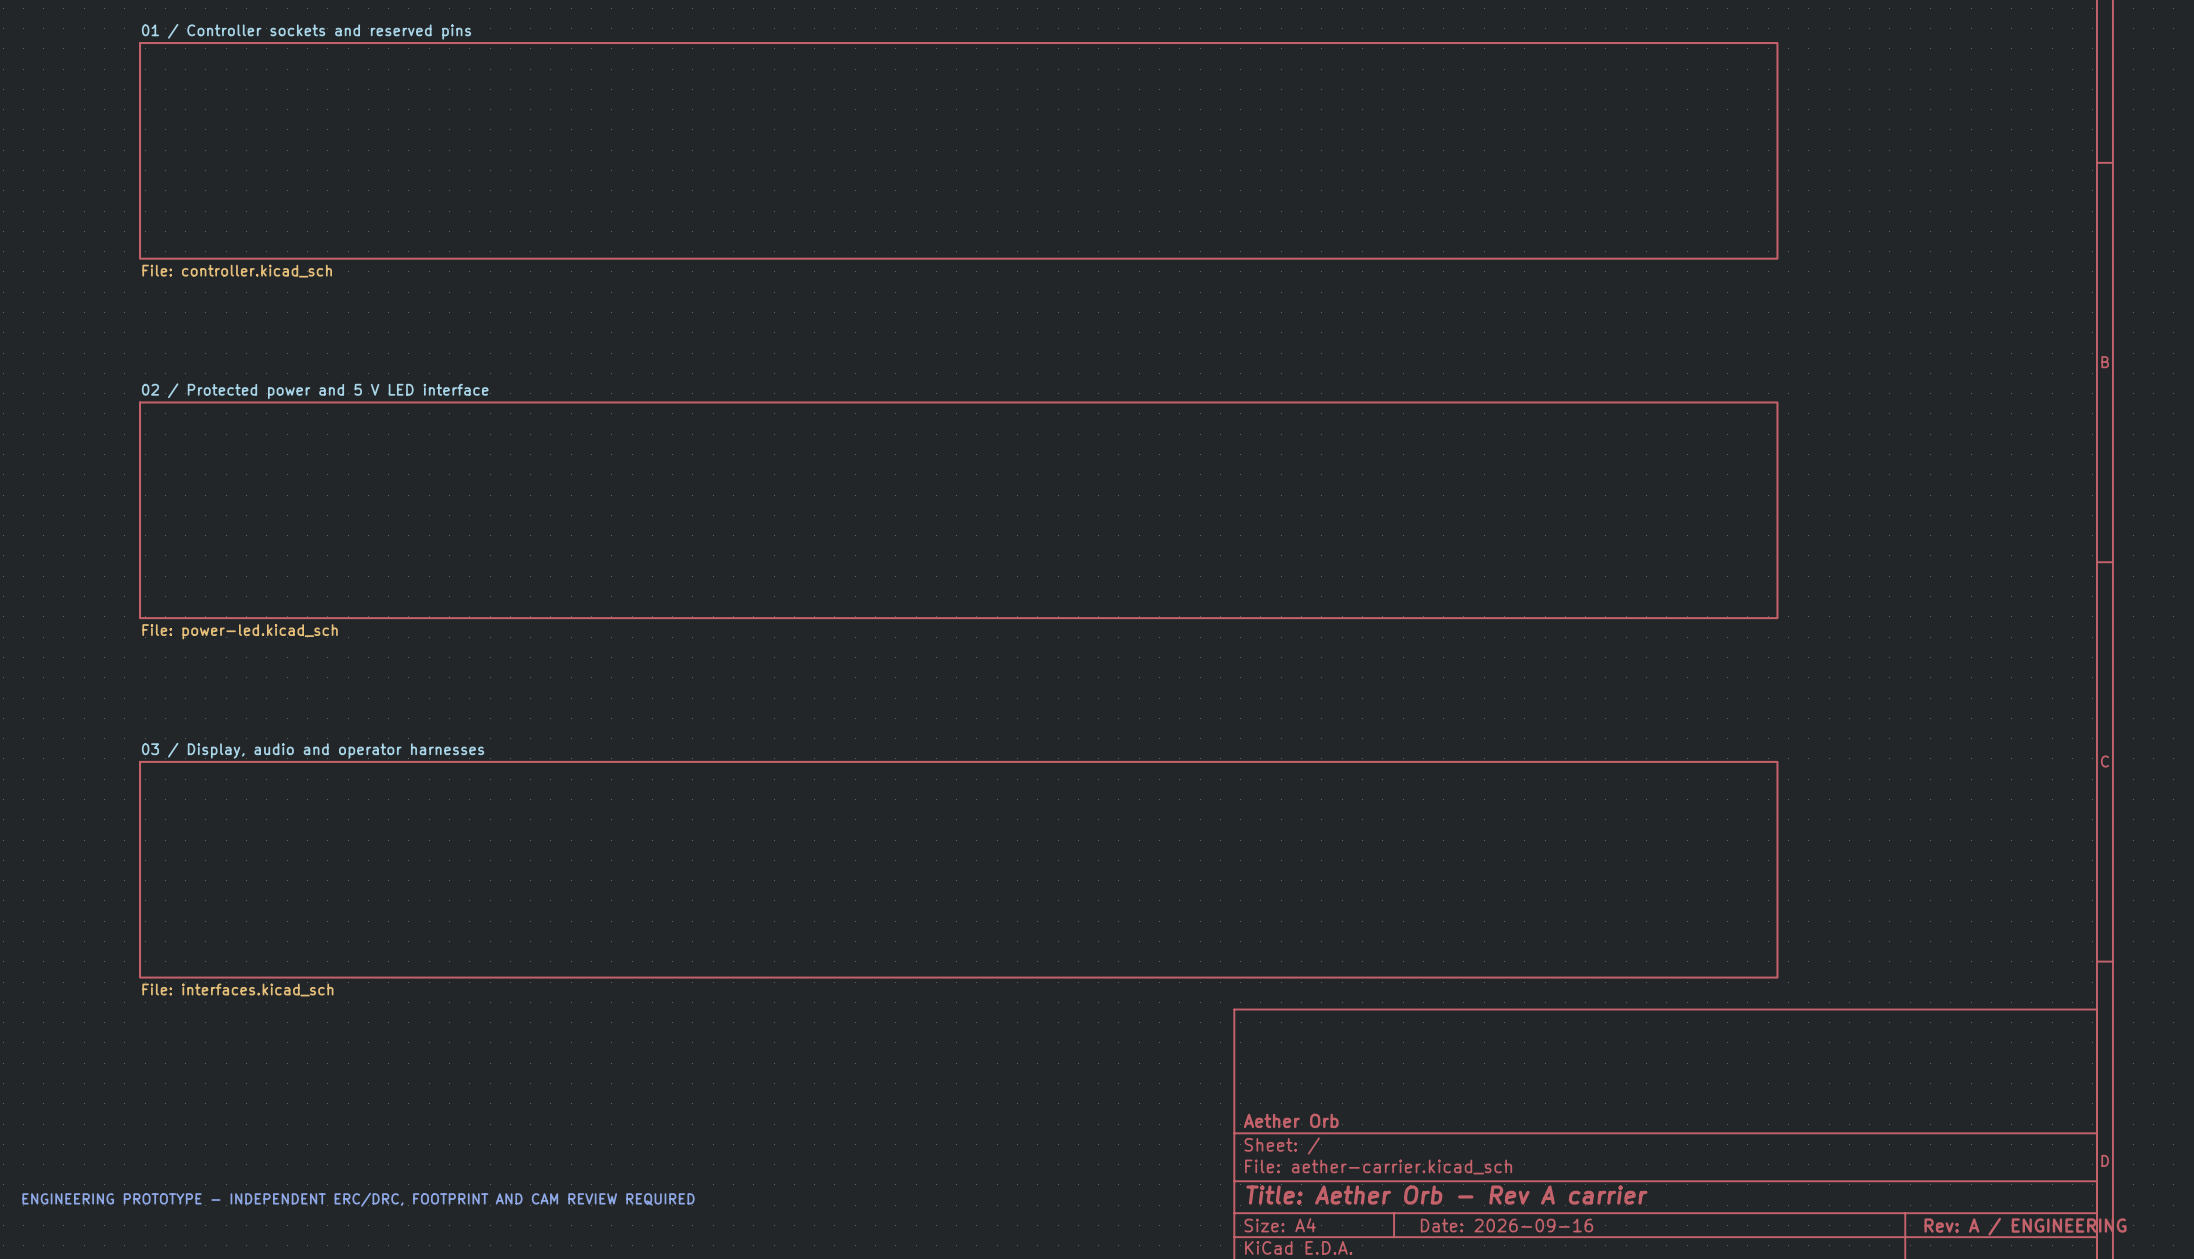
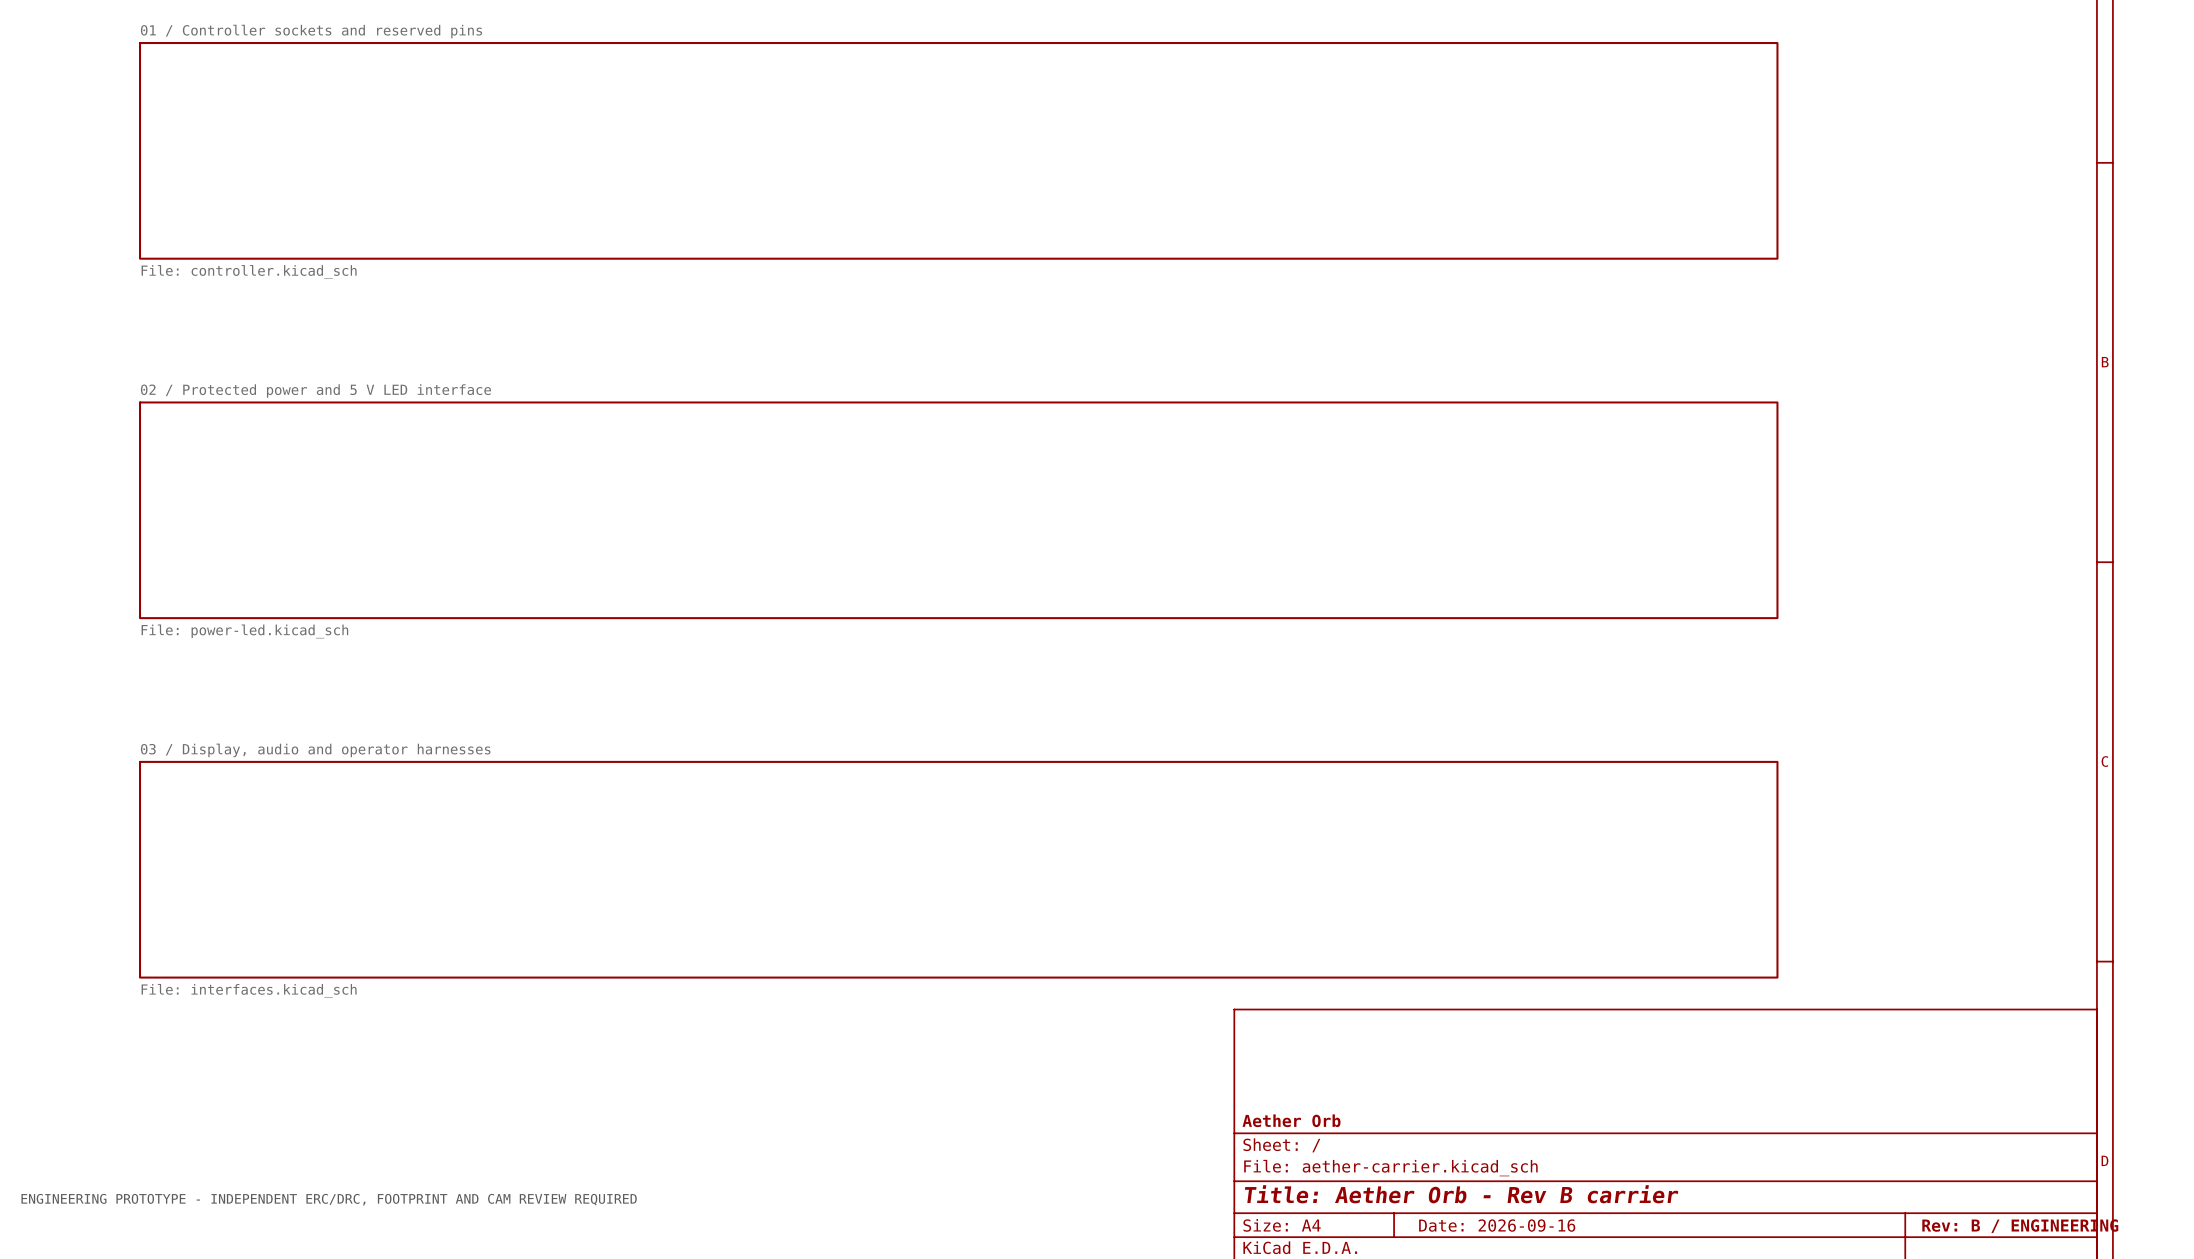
title block: Title: Aether Orb - Rev A carrier (1446, 1195) -> Title: Aether Orb - Rev B carrier (1461, 1194)
title block: Rev: A / ENGINEERING (2025, 1226) -> Rev: B / ENGINEERING (2020, 1226)

